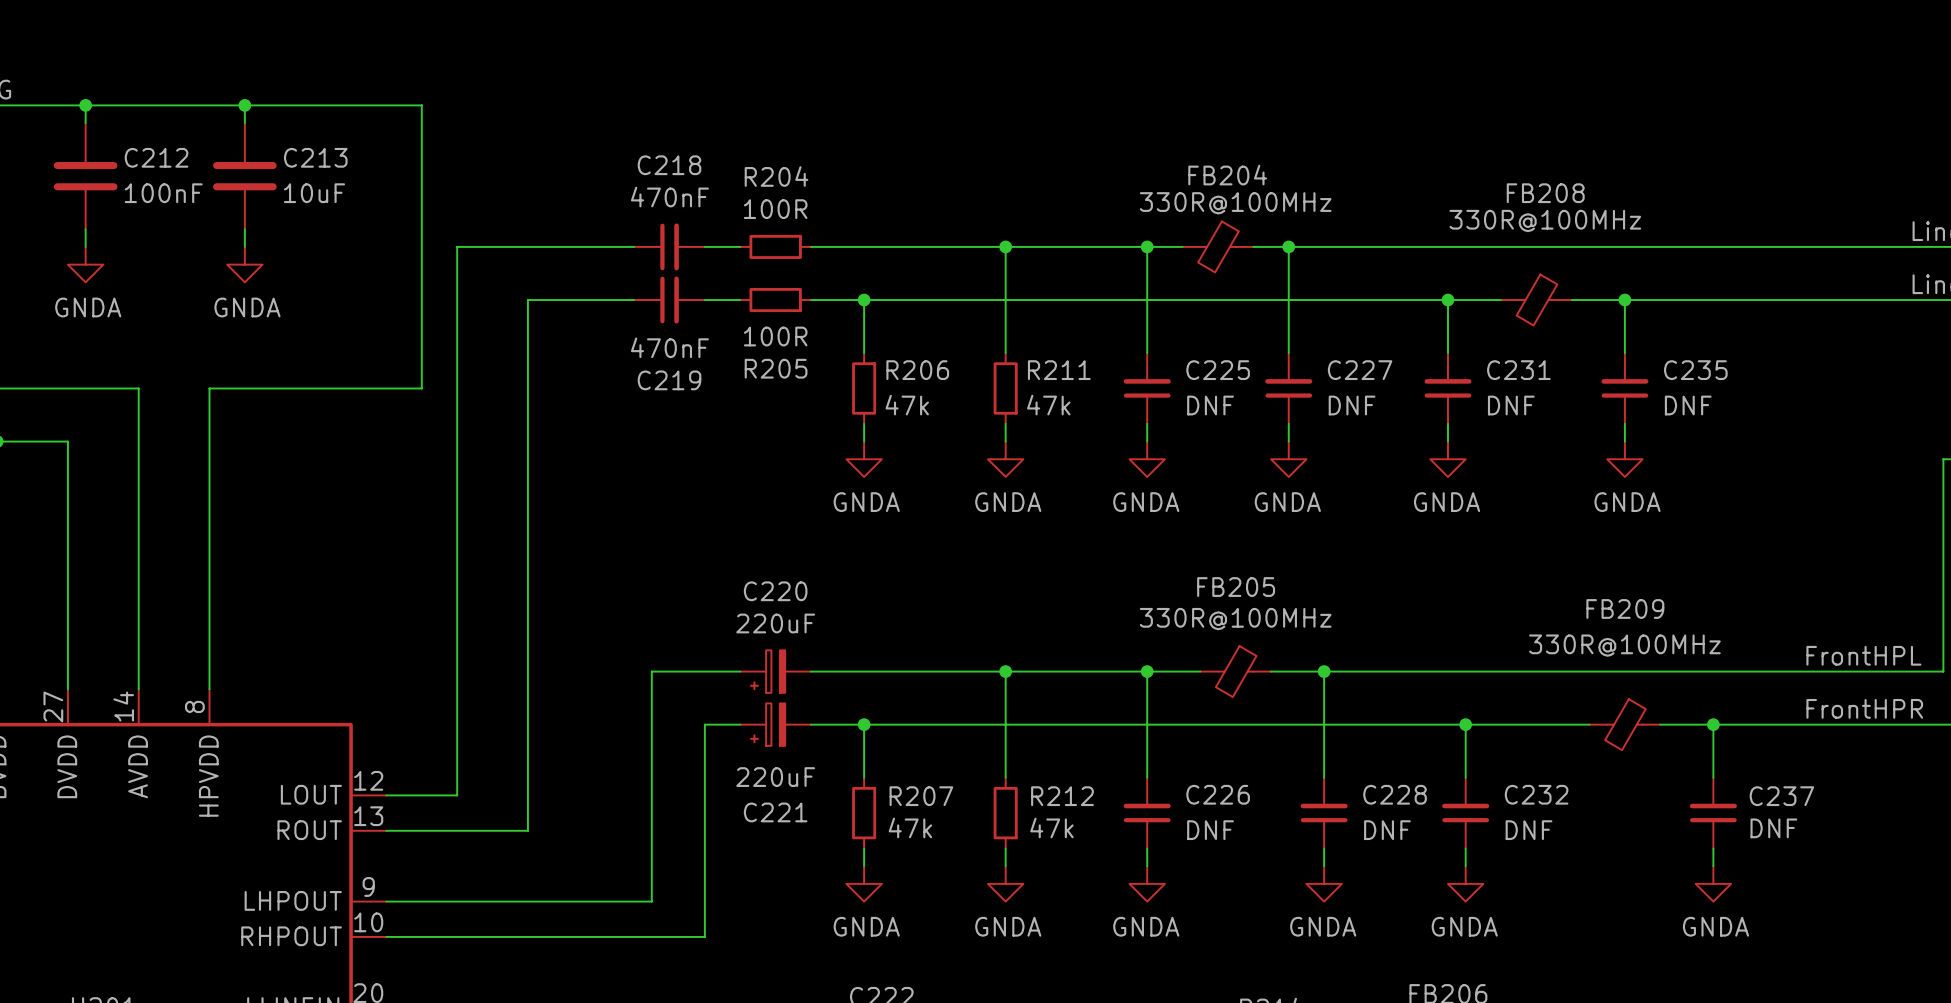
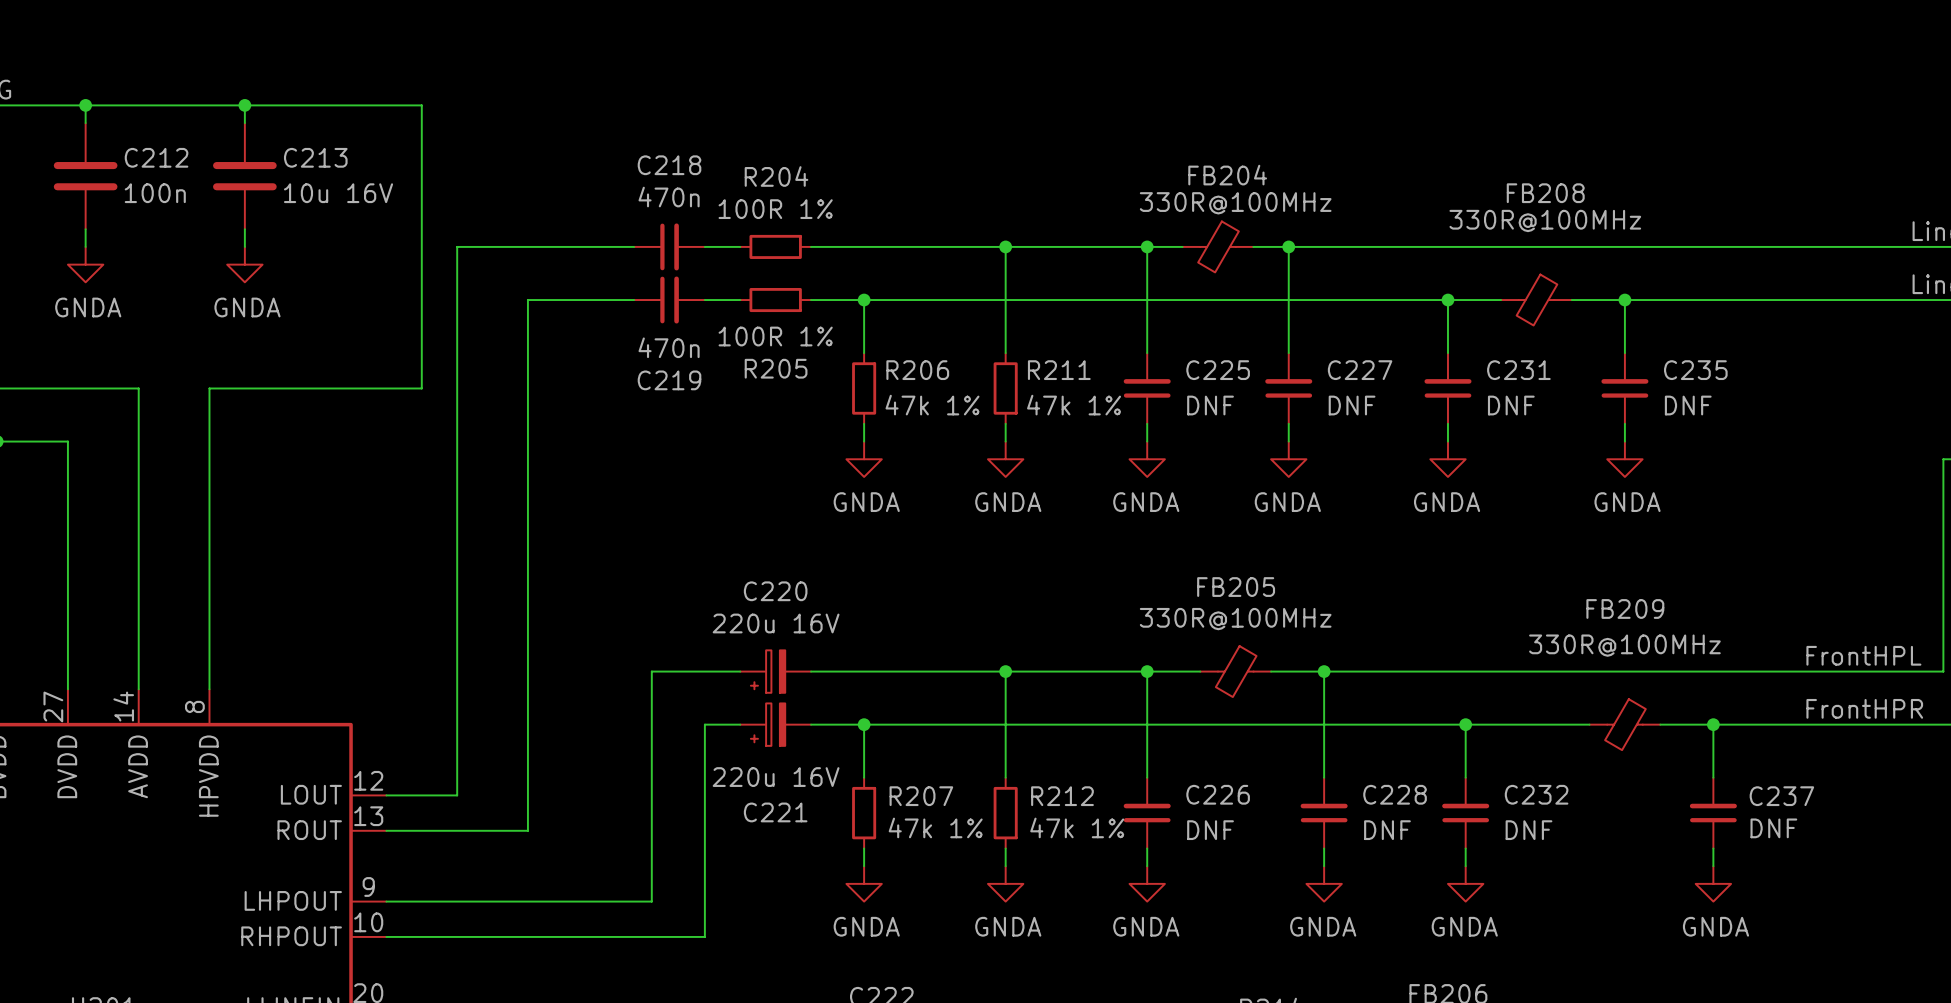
C212 value: 100nF (163, 193) -> 100n (155, 193)
C213 value: 10uF (314, 193) -> 10u 16V (338, 193)
C218 value: 470nF (669, 197) -> 470n (669, 197)
R204 value: 100R (775, 209) -> 100R 1% (775, 209)
R205 value: 100R (775, 336) -> 100R 1% (775, 336)
C219 value: 470nF (669, 347) -> 470n (669, 347)
R206 value: 47k (907, 405) -> 47k 1% (932, 405)
R211 value: 47k (1048, 405) -> 47k 1% (1074, 405)
C220 value: 220uF (775, 623) -> 220u 16V (776, 623)
C221 value: 220uF (775, 777) -> 220u 16V (776, 777)
R207 value: 47k (910, 827) -> 47k 1% (935, 827)
R212 value: 47k (1051, 827) -> 47k 1% (1077, 827)

